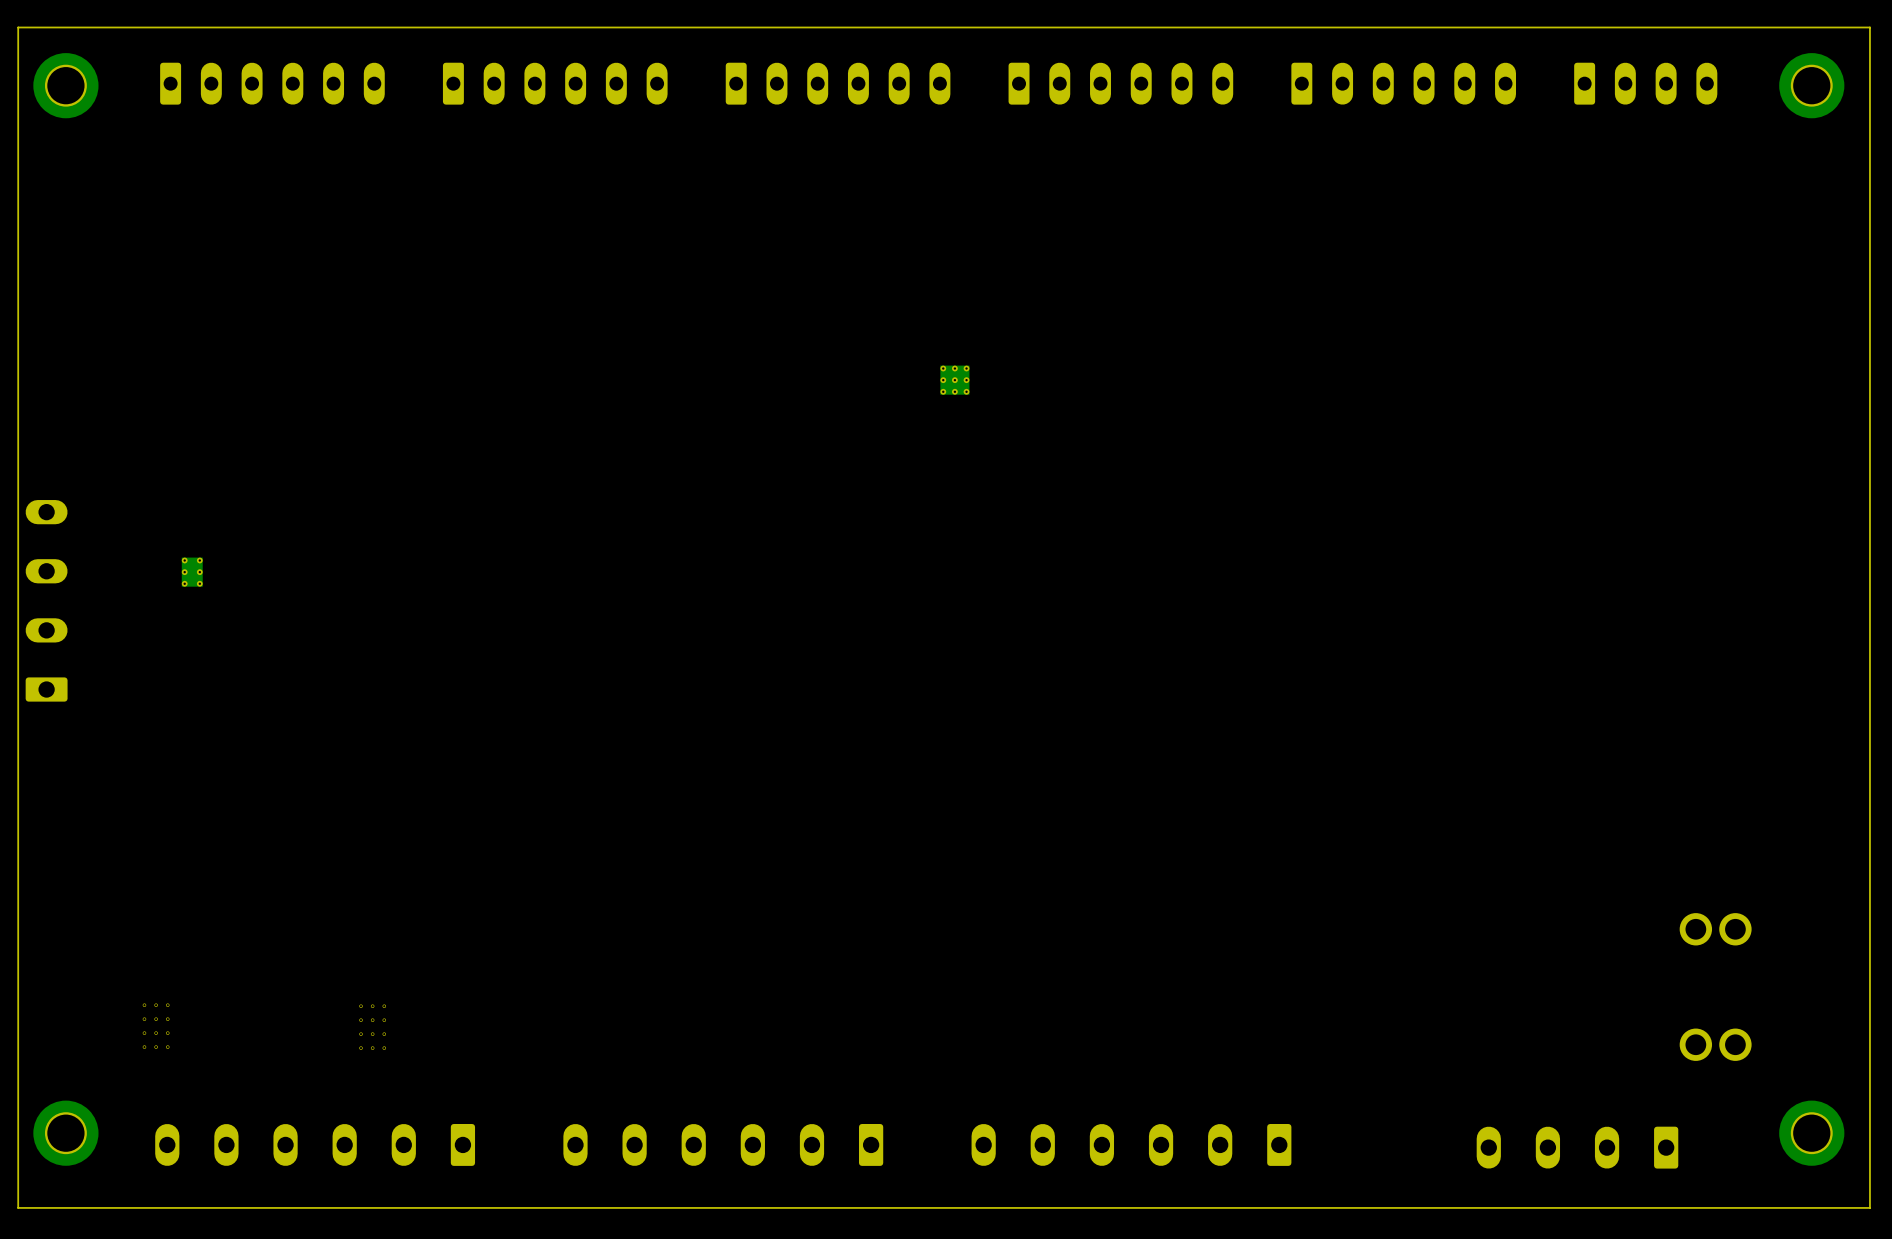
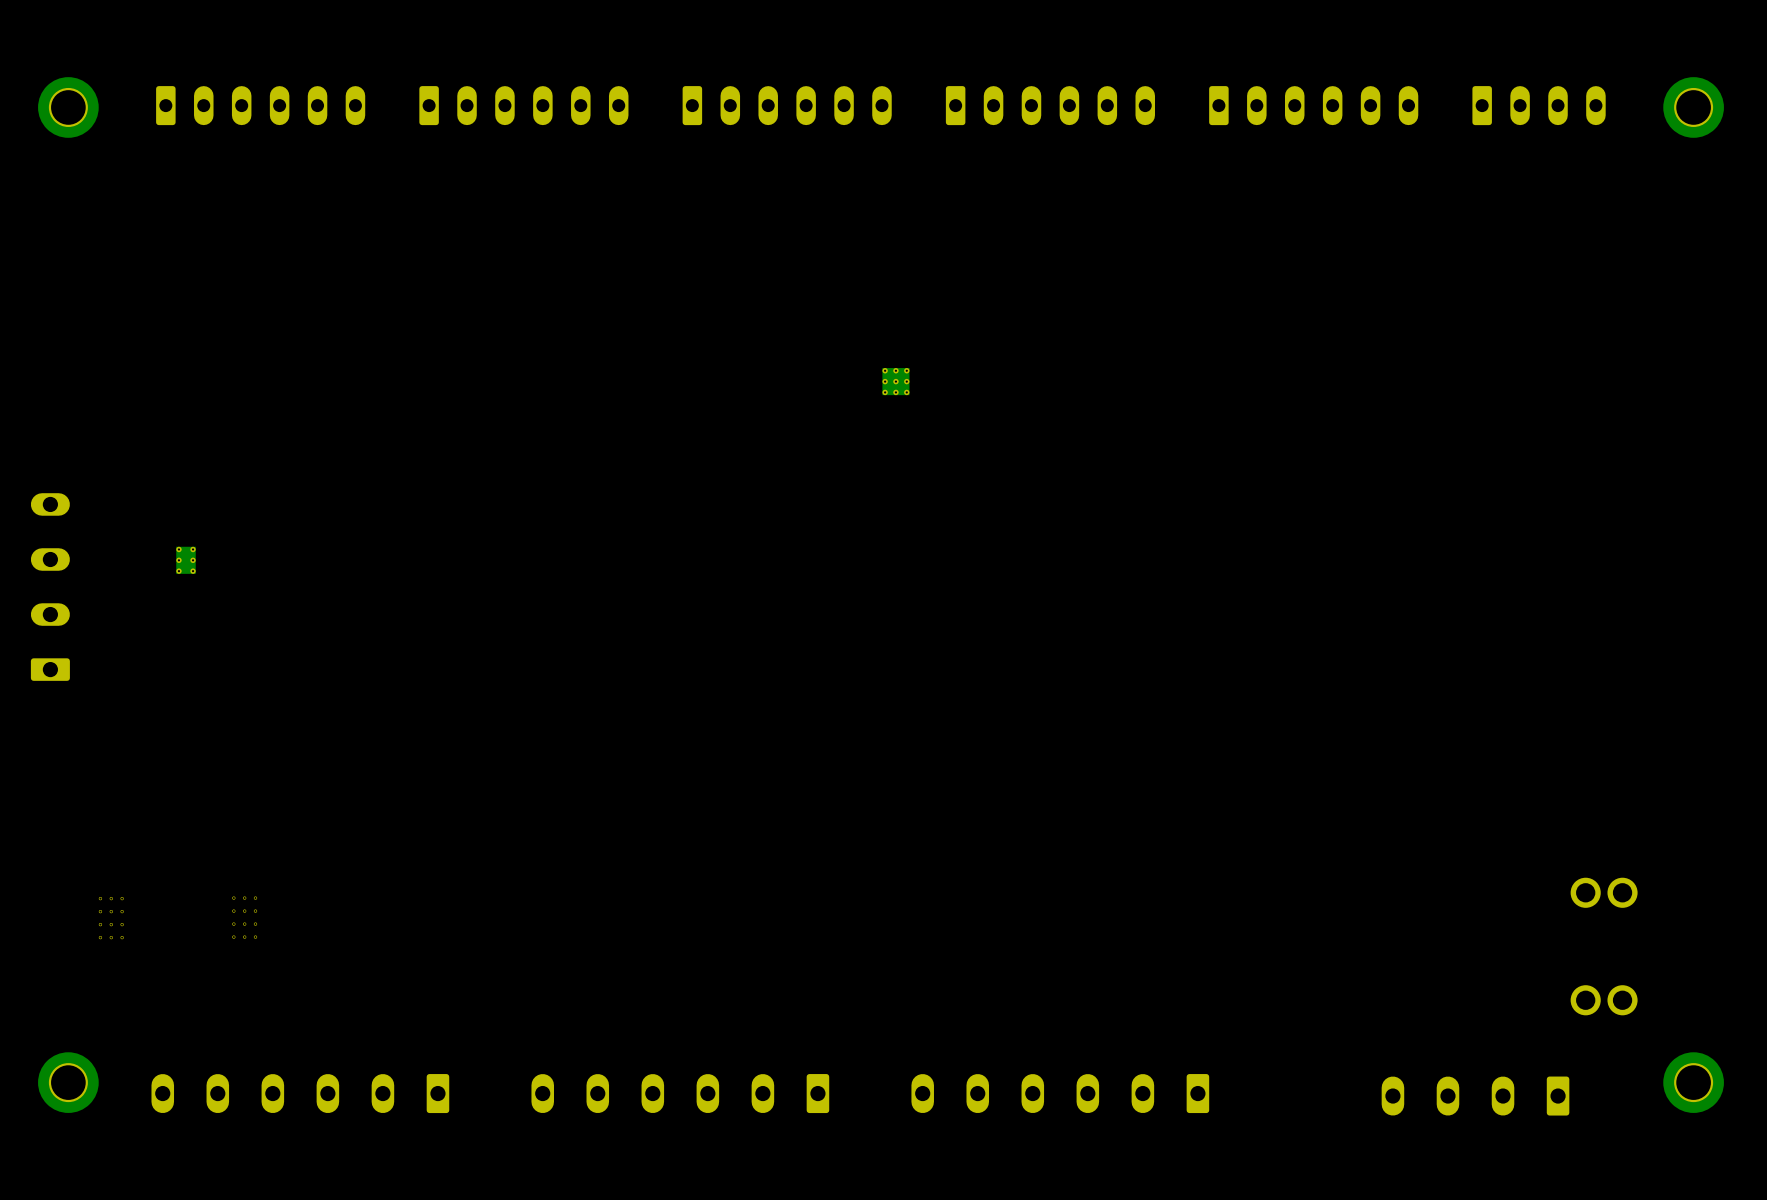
board edge: (1869, 27) (18, 27) (18, 1207) (1869, 1207) (1869, 27) -> none
part: none -> (244, 917)
part: none -> (111, 918)
part: (156, 1026) -> none
part: (372, 1027) -> none

